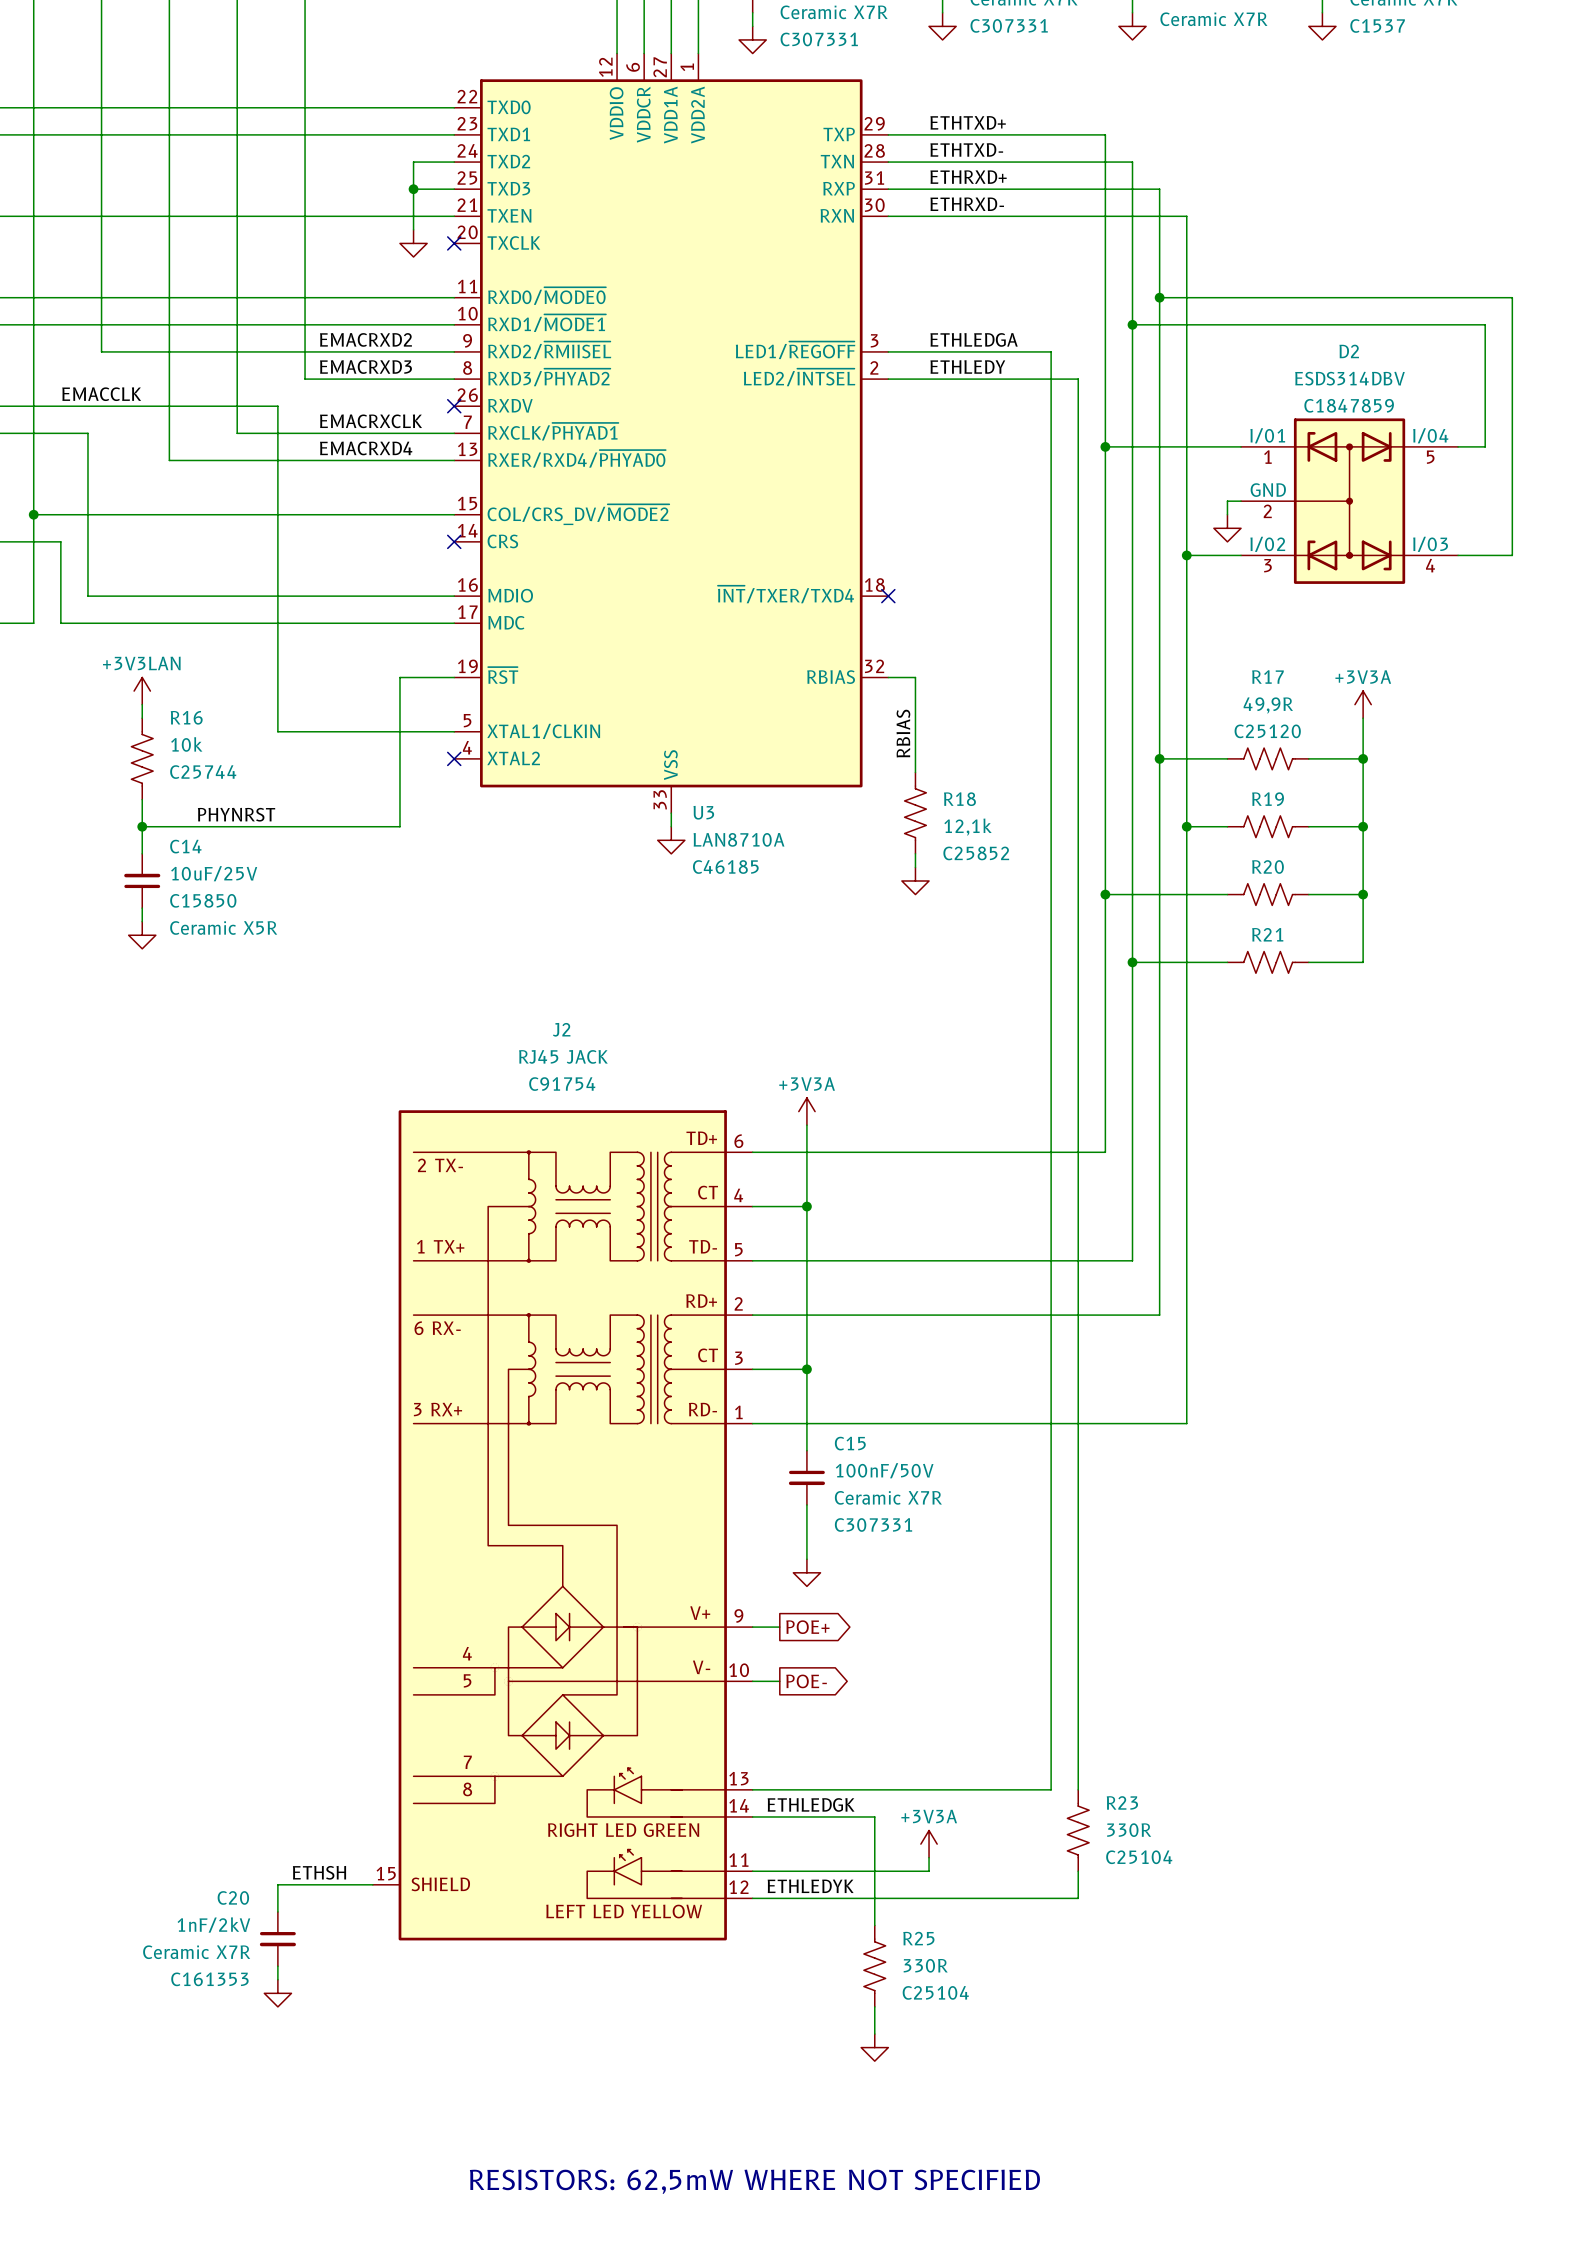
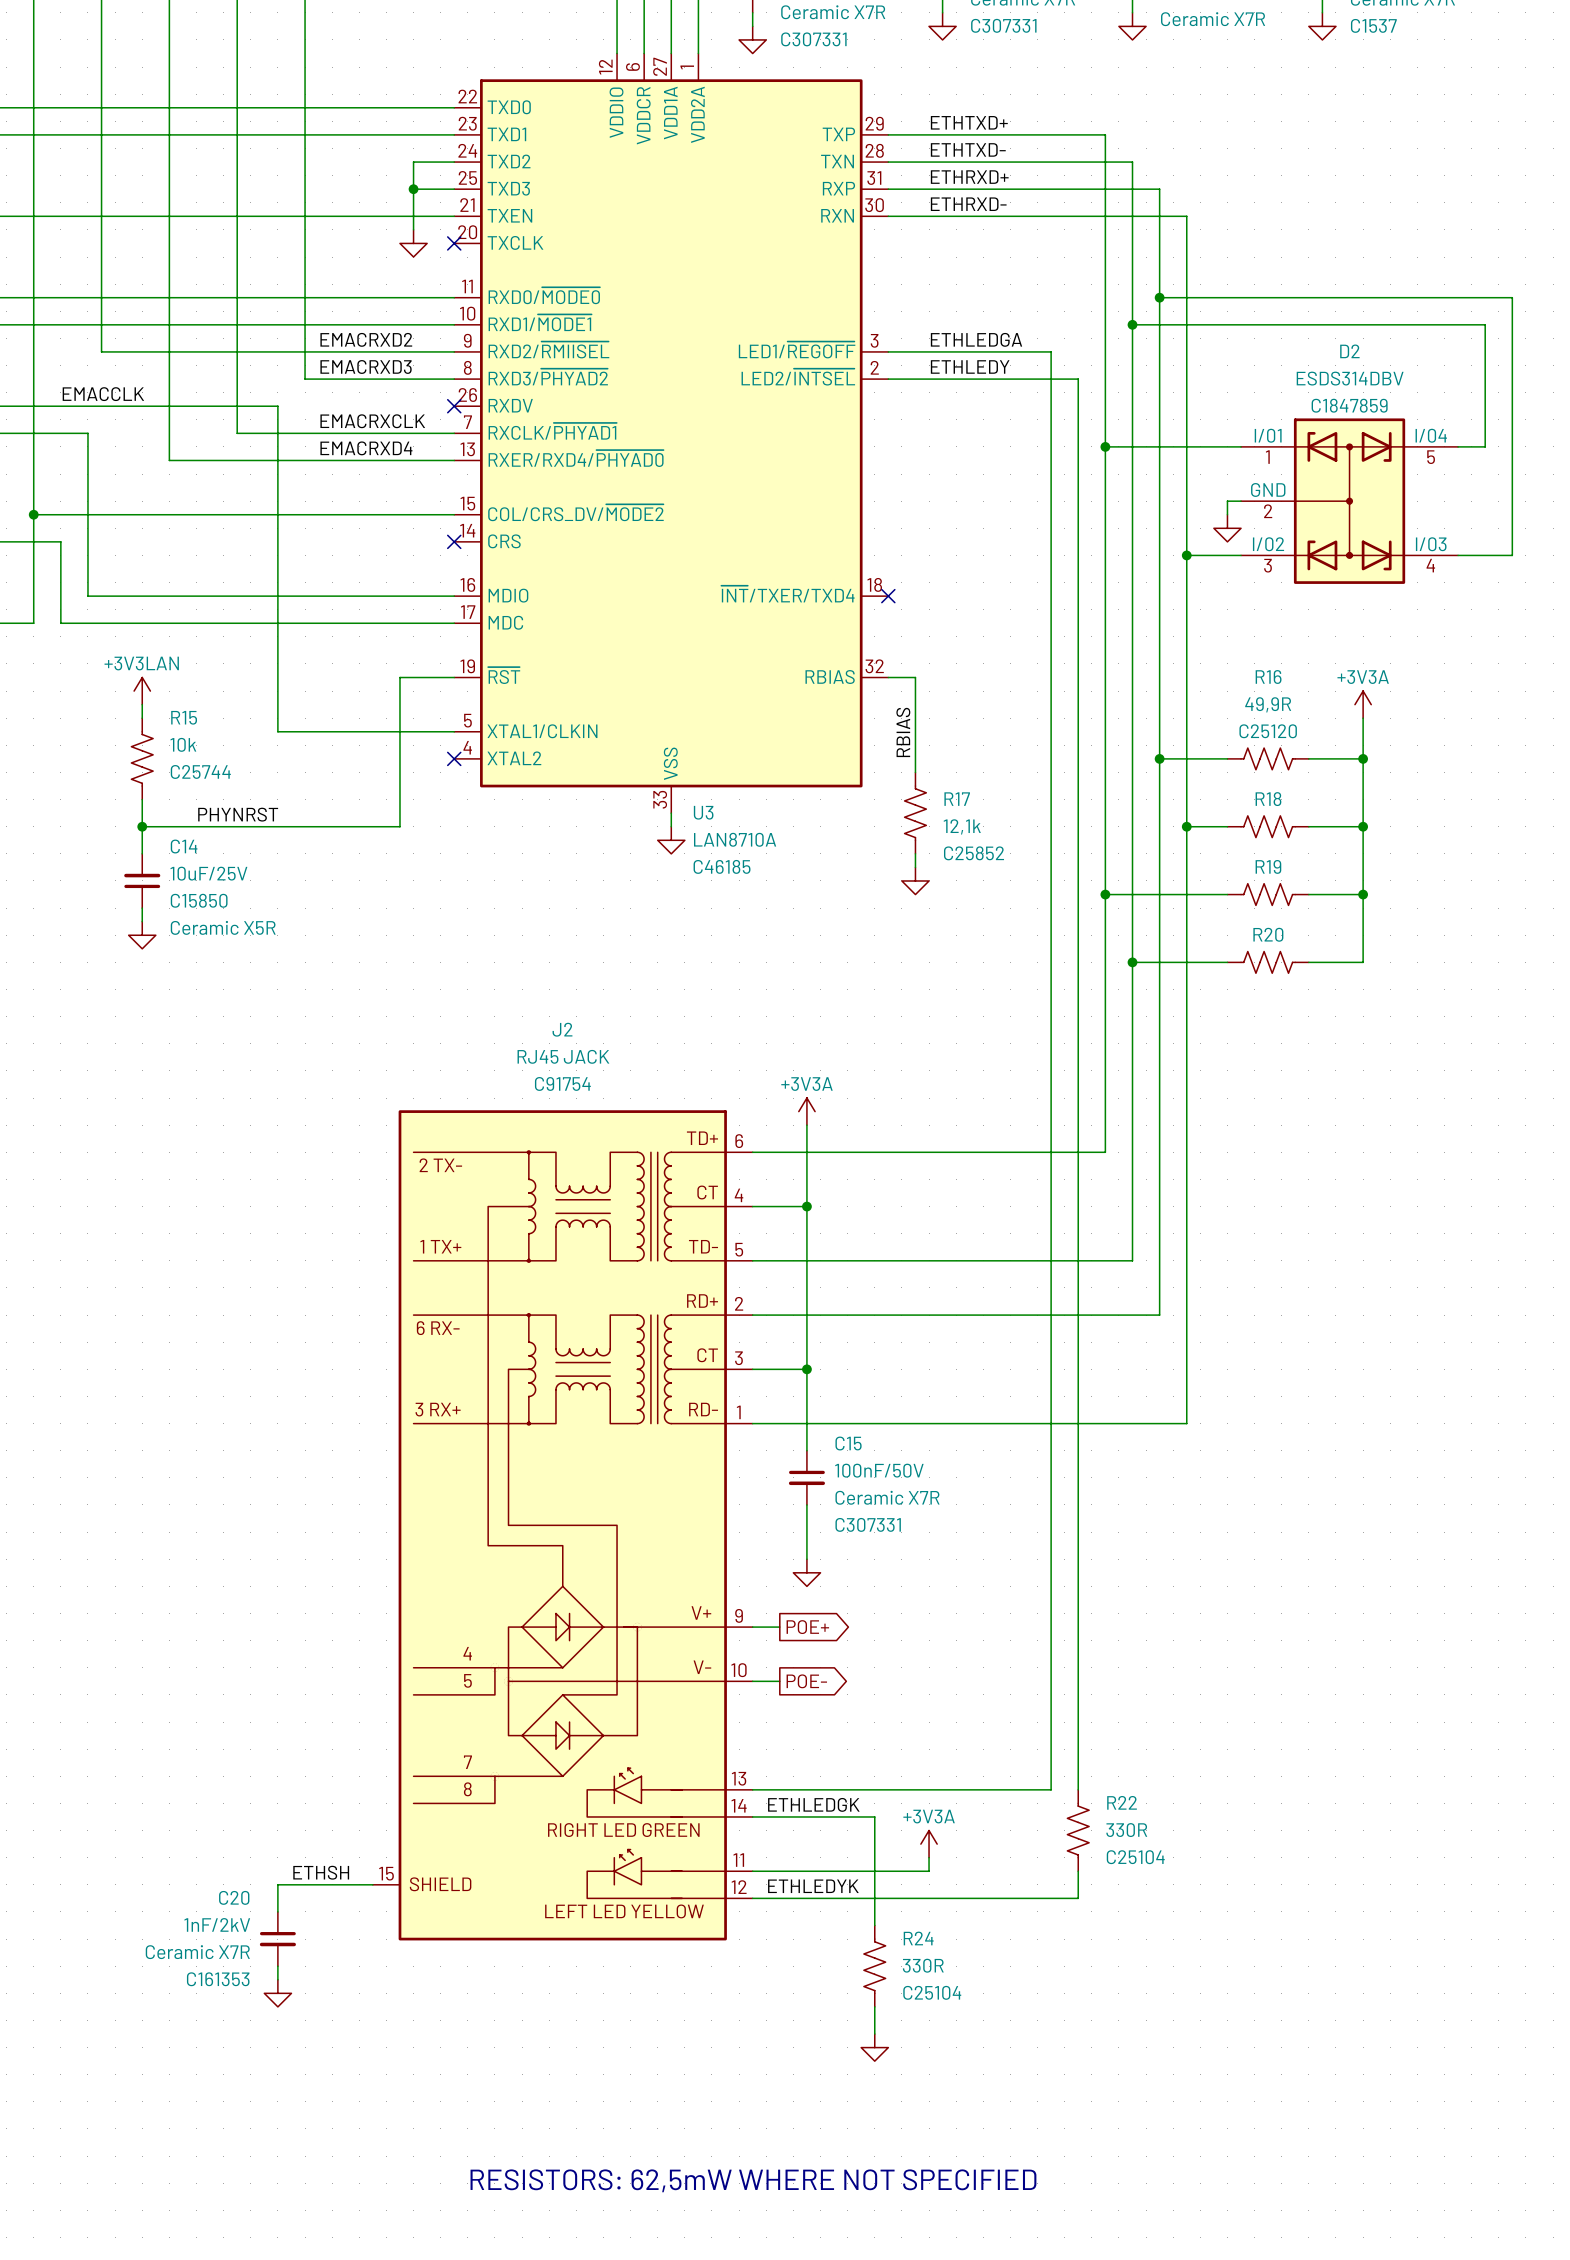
R17 name: R17 (1267, 677) -> R16 (1268, 677)
R16 name: R16 (186, 717) -> R15 (184, 717)
R18 name: R18 (959, 799) -> R17 (957, 799)
R19 name: R19 (1268, 799) -> R18 (1268, 799)
R20 name: R20 (1268, 867) -> R19 (1268, 866)
R21 name: R21 (1267, 934) -> R20 (1268, 934)
R23 name: R23 (1122, 1802) -> R22 (1122, 1802)
R25 name: R25 (918, 1938) -> R24 (918, 1938)

